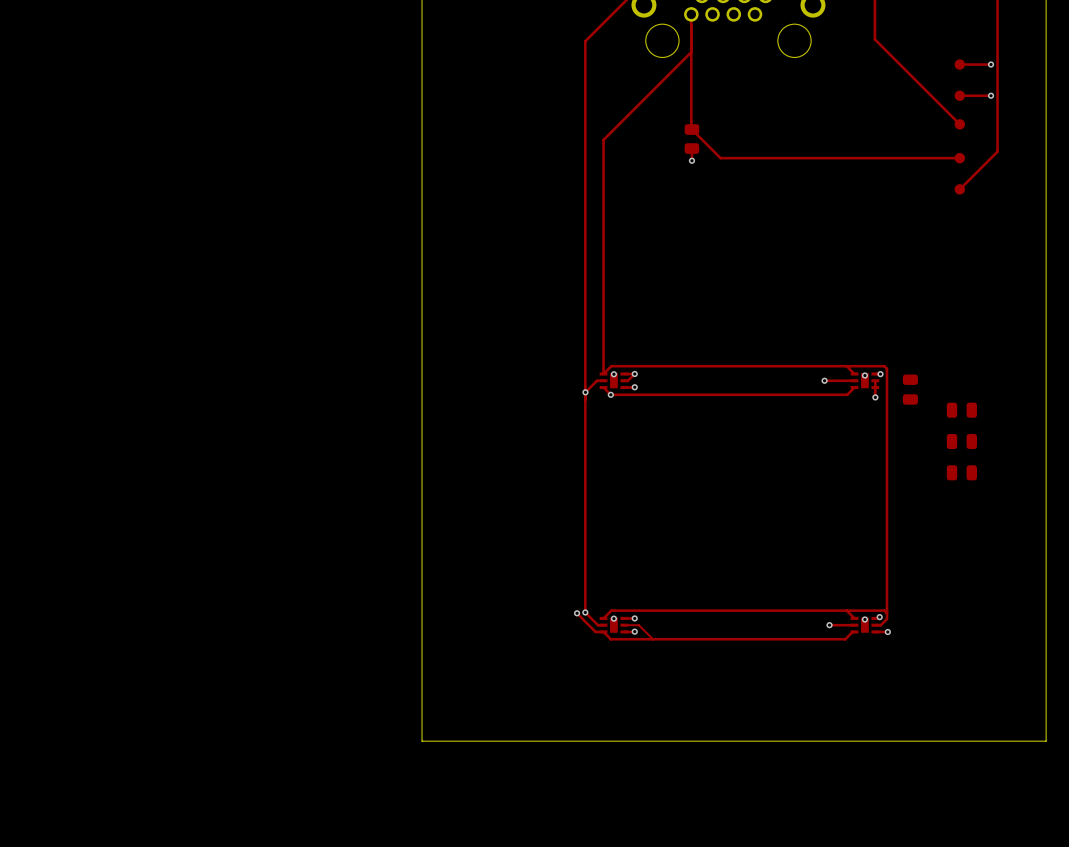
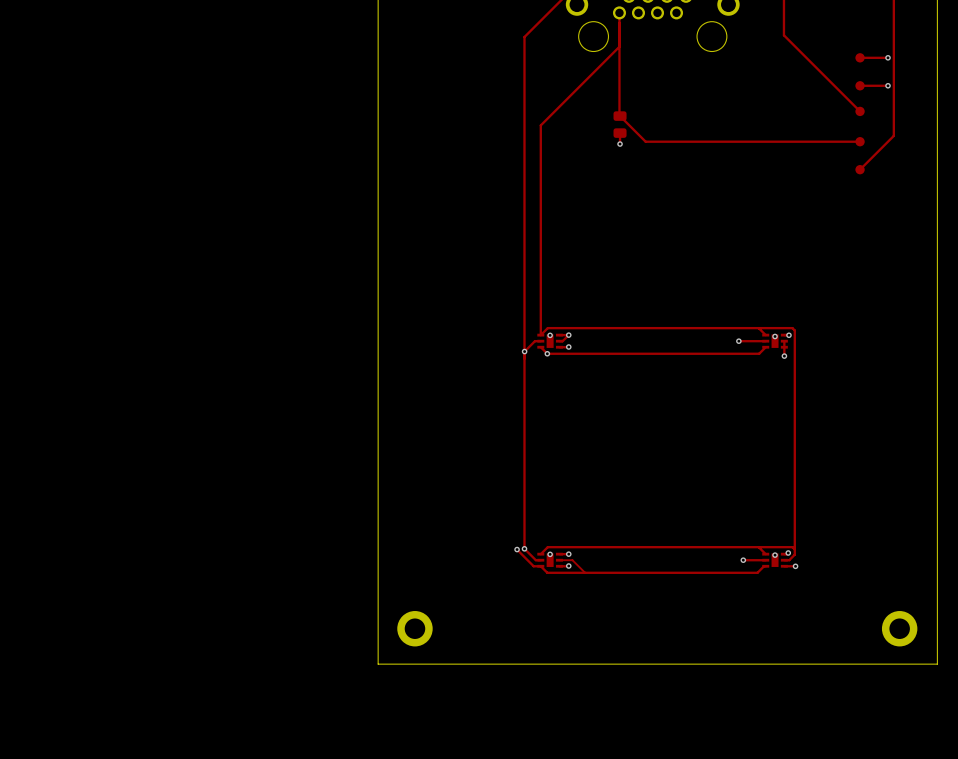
part: (910, 389) -> none
part: (961, 410) -> none
part: (961, 441) -> none
part: (961, 472) -> none
part: none -> (414, 628)
part: none -> (899, 628)

